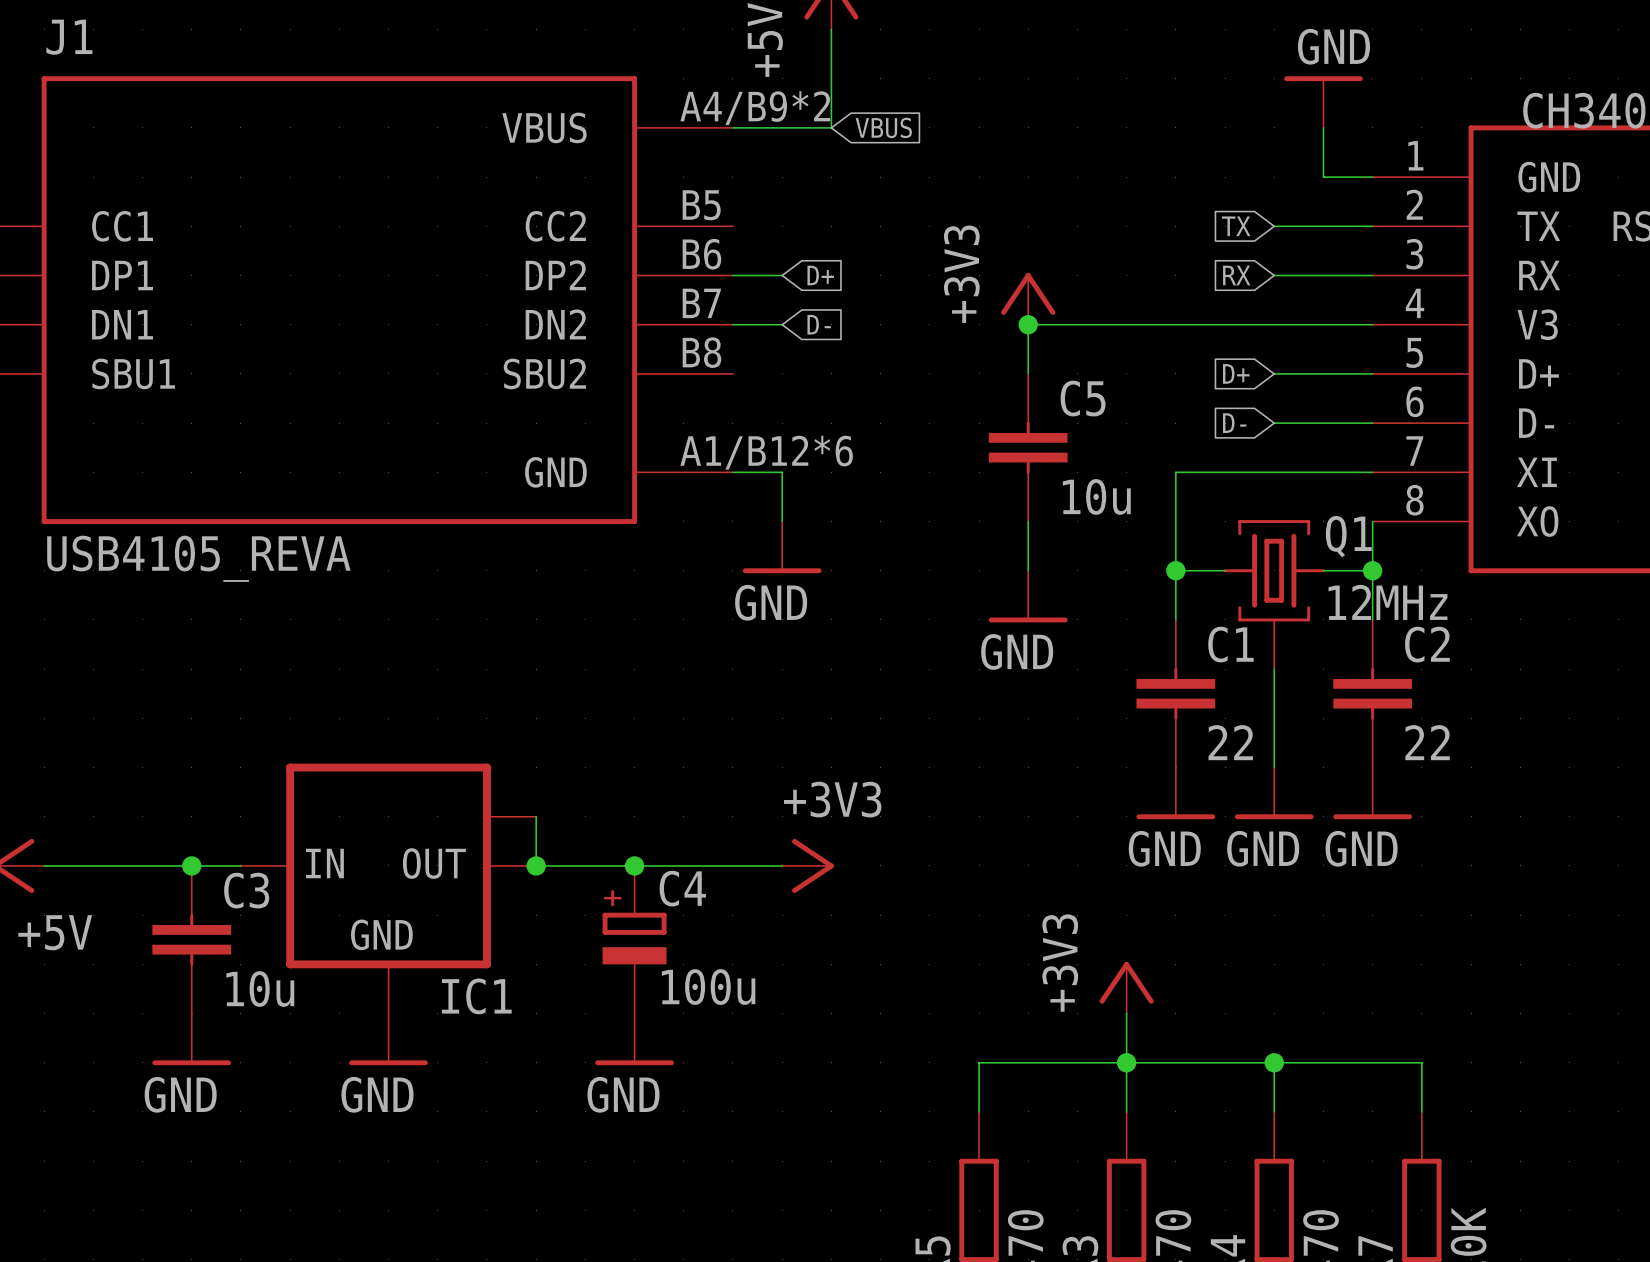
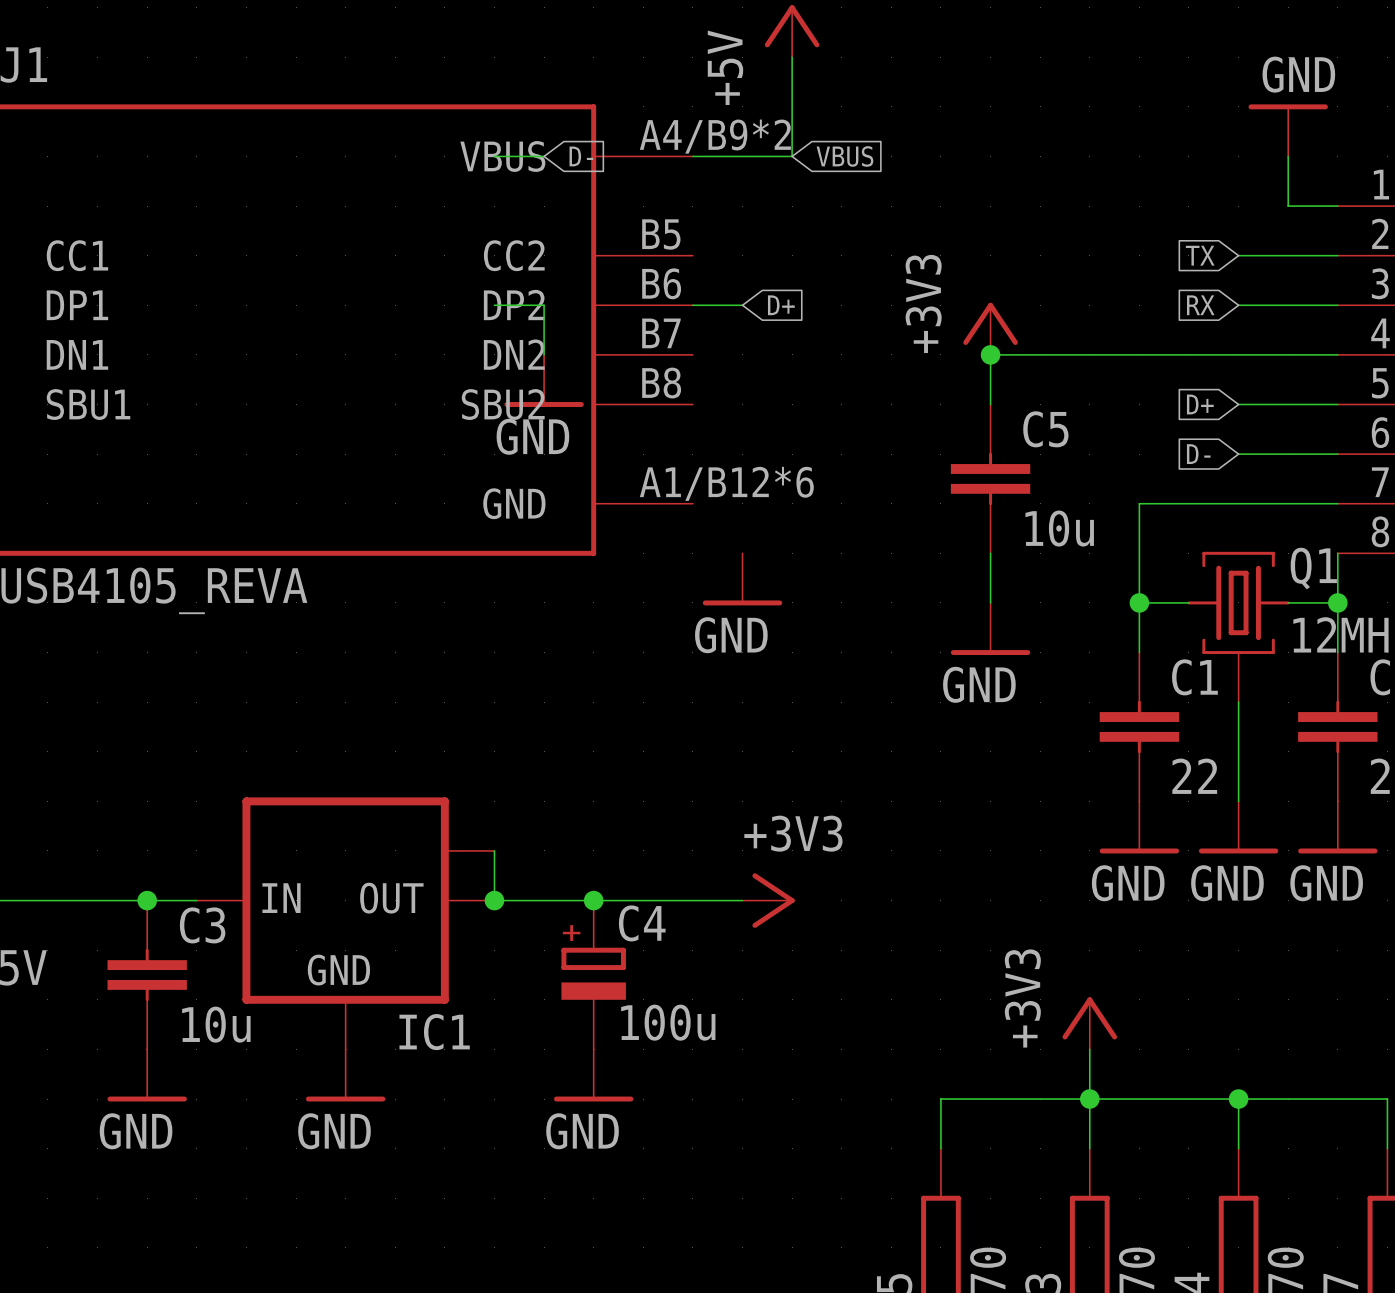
wire: (732, 324) (782, 324) -> (494, 156) (544, 156)
global label position: D- (819, 324) -> D- (581, 156)
power symbol: none -> GND (544, 380)
wire: (732, 472) (782, 472) (782, 521) -> (494, 305) (544, 305) (544, 354)

